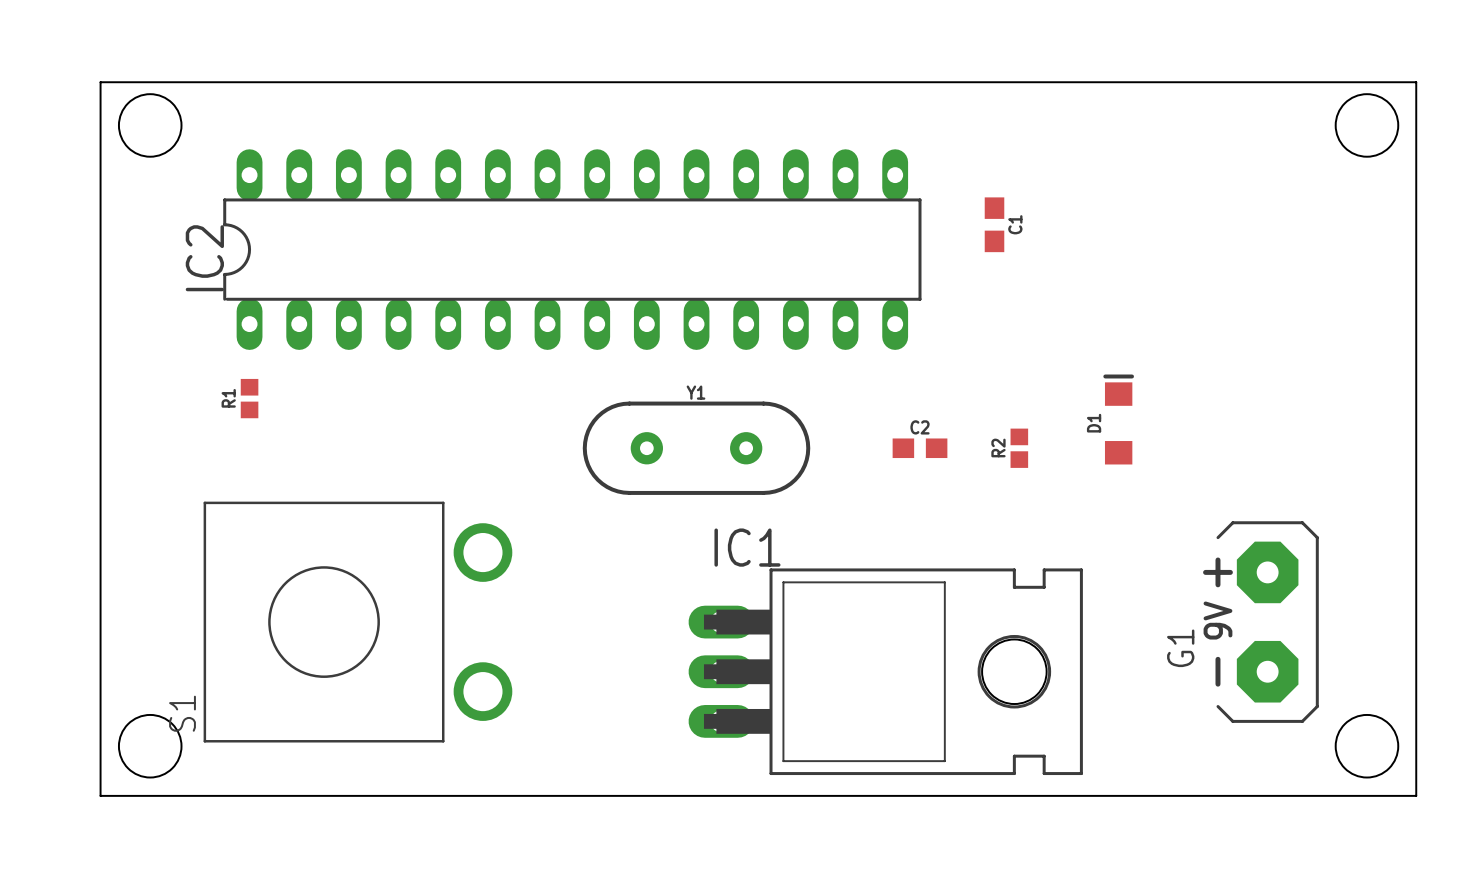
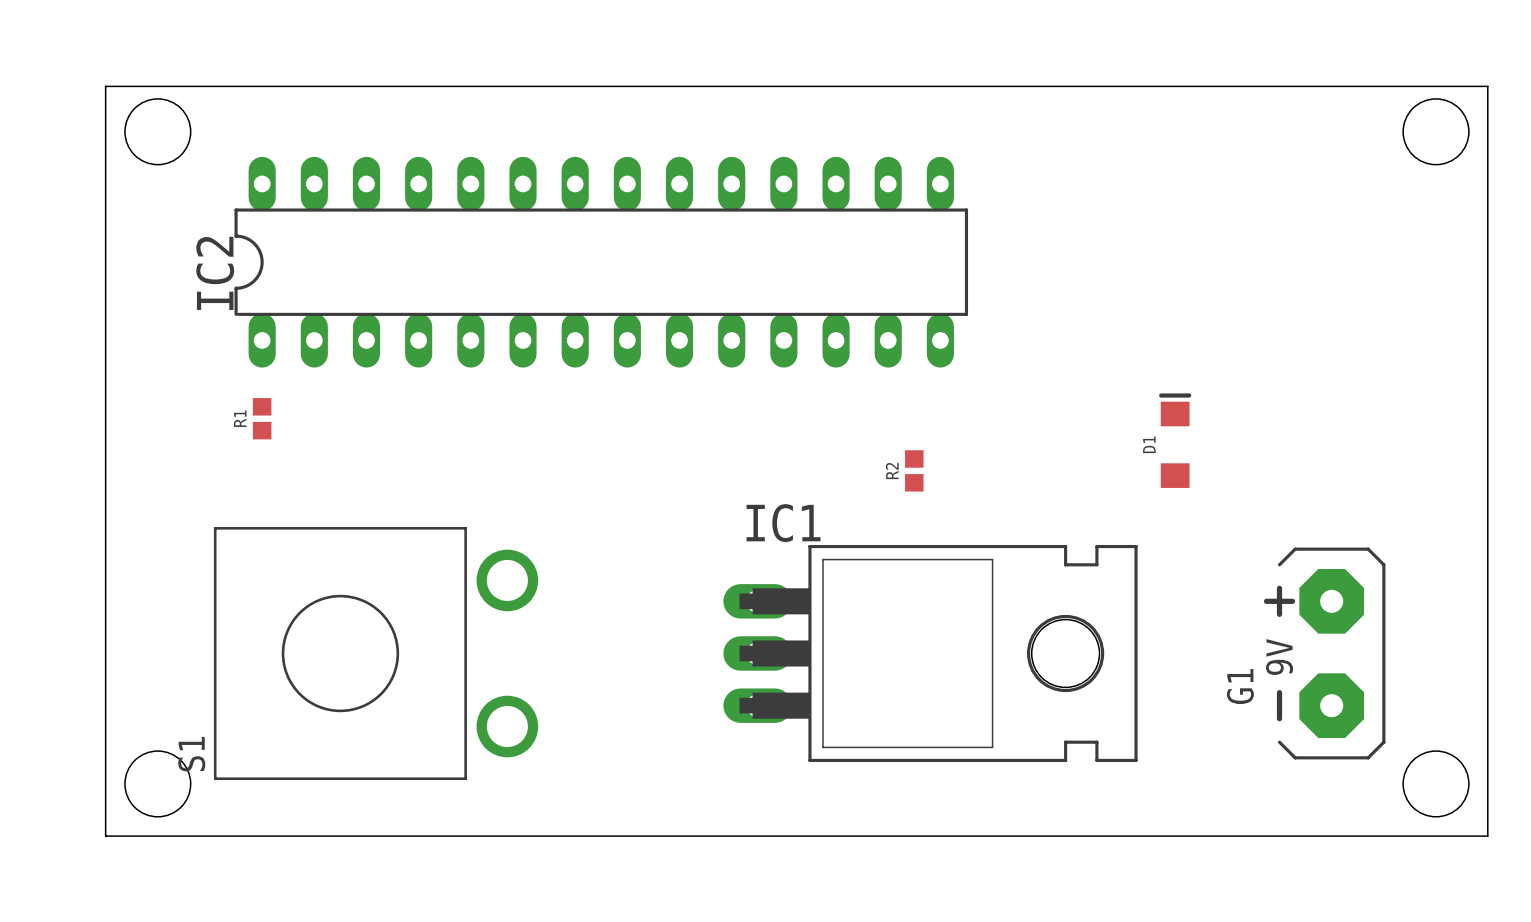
C1: (994, 224) -> none
Y1: (696, 448) -> none
C2: (920, 448) -> none
R2 position: (1019, 448) -> (914, 470)
IC1 position: (885, 671) -> (930, 653)

